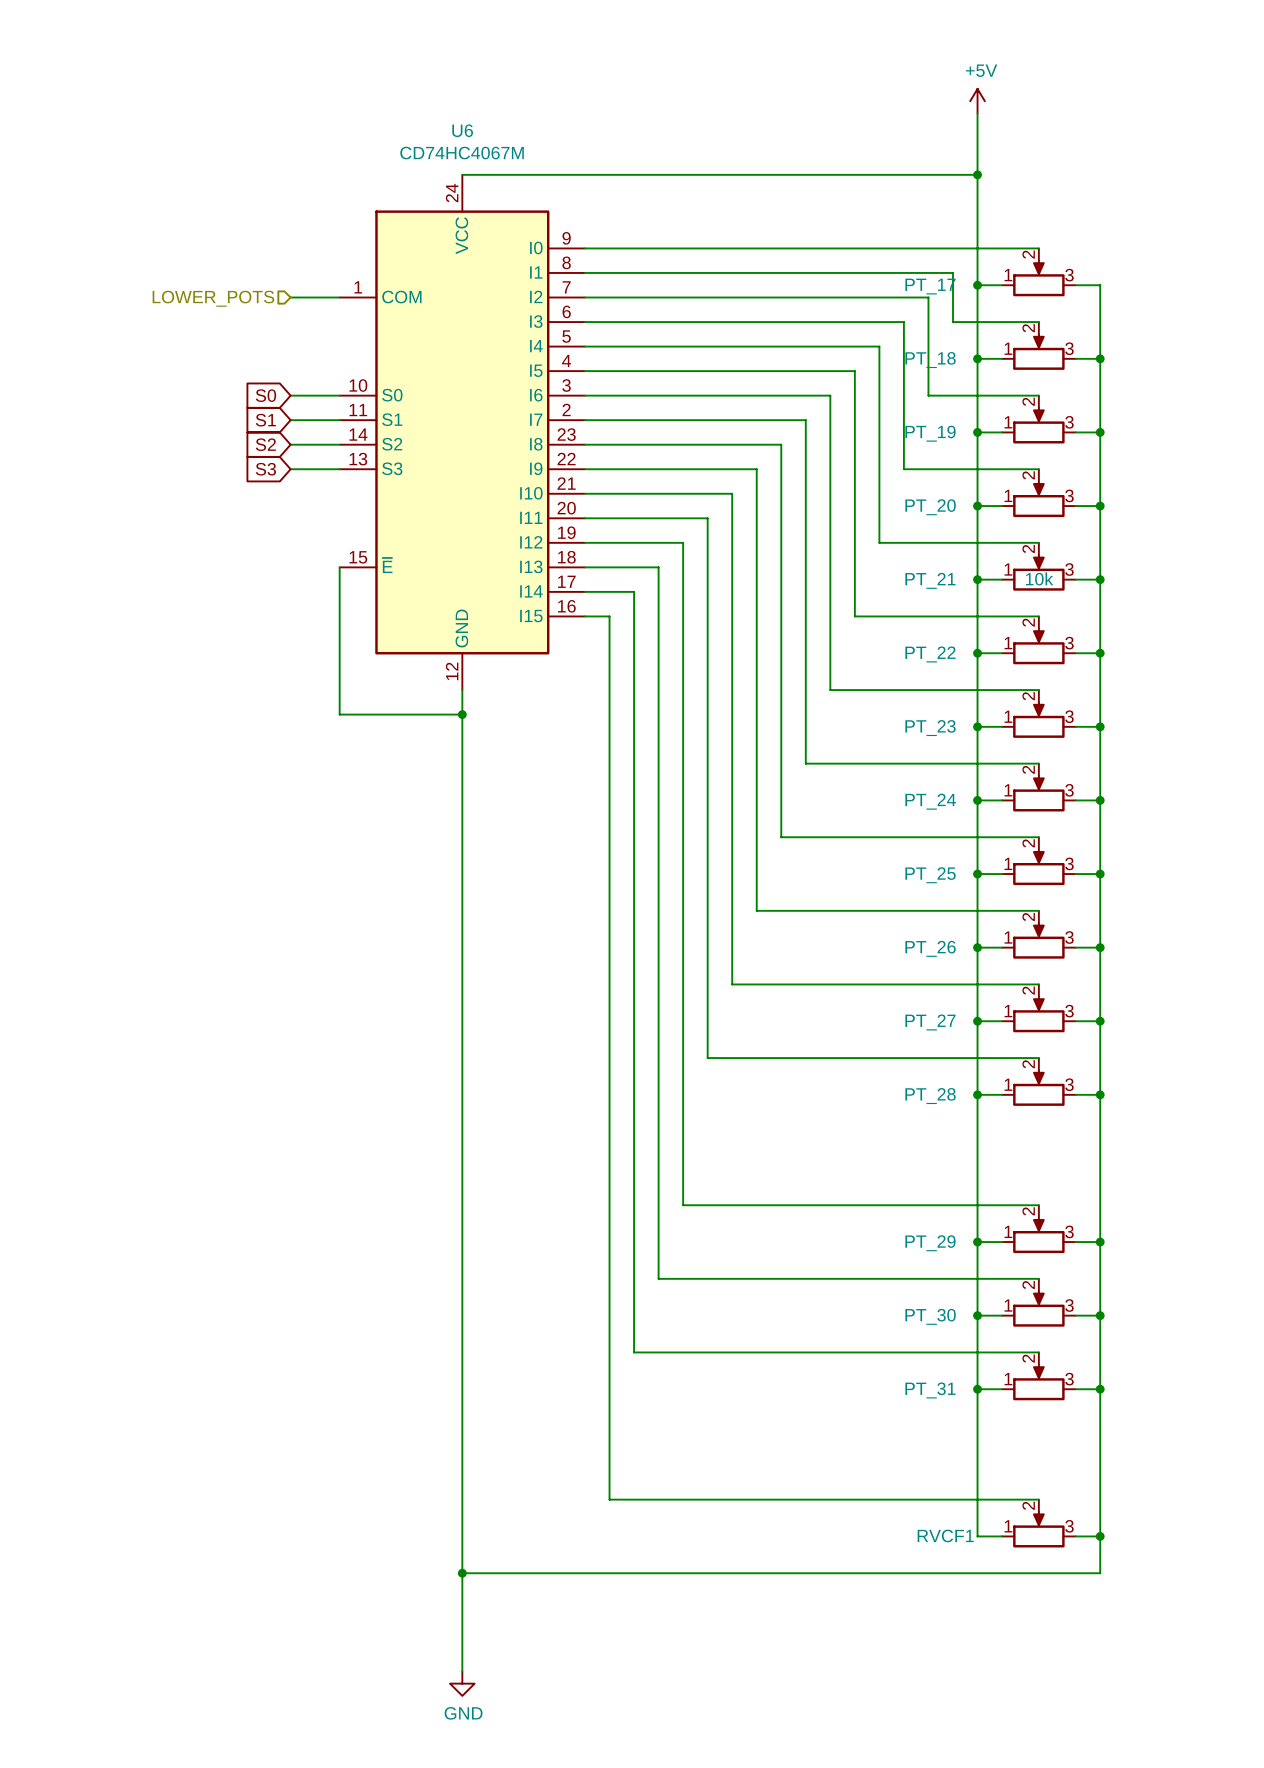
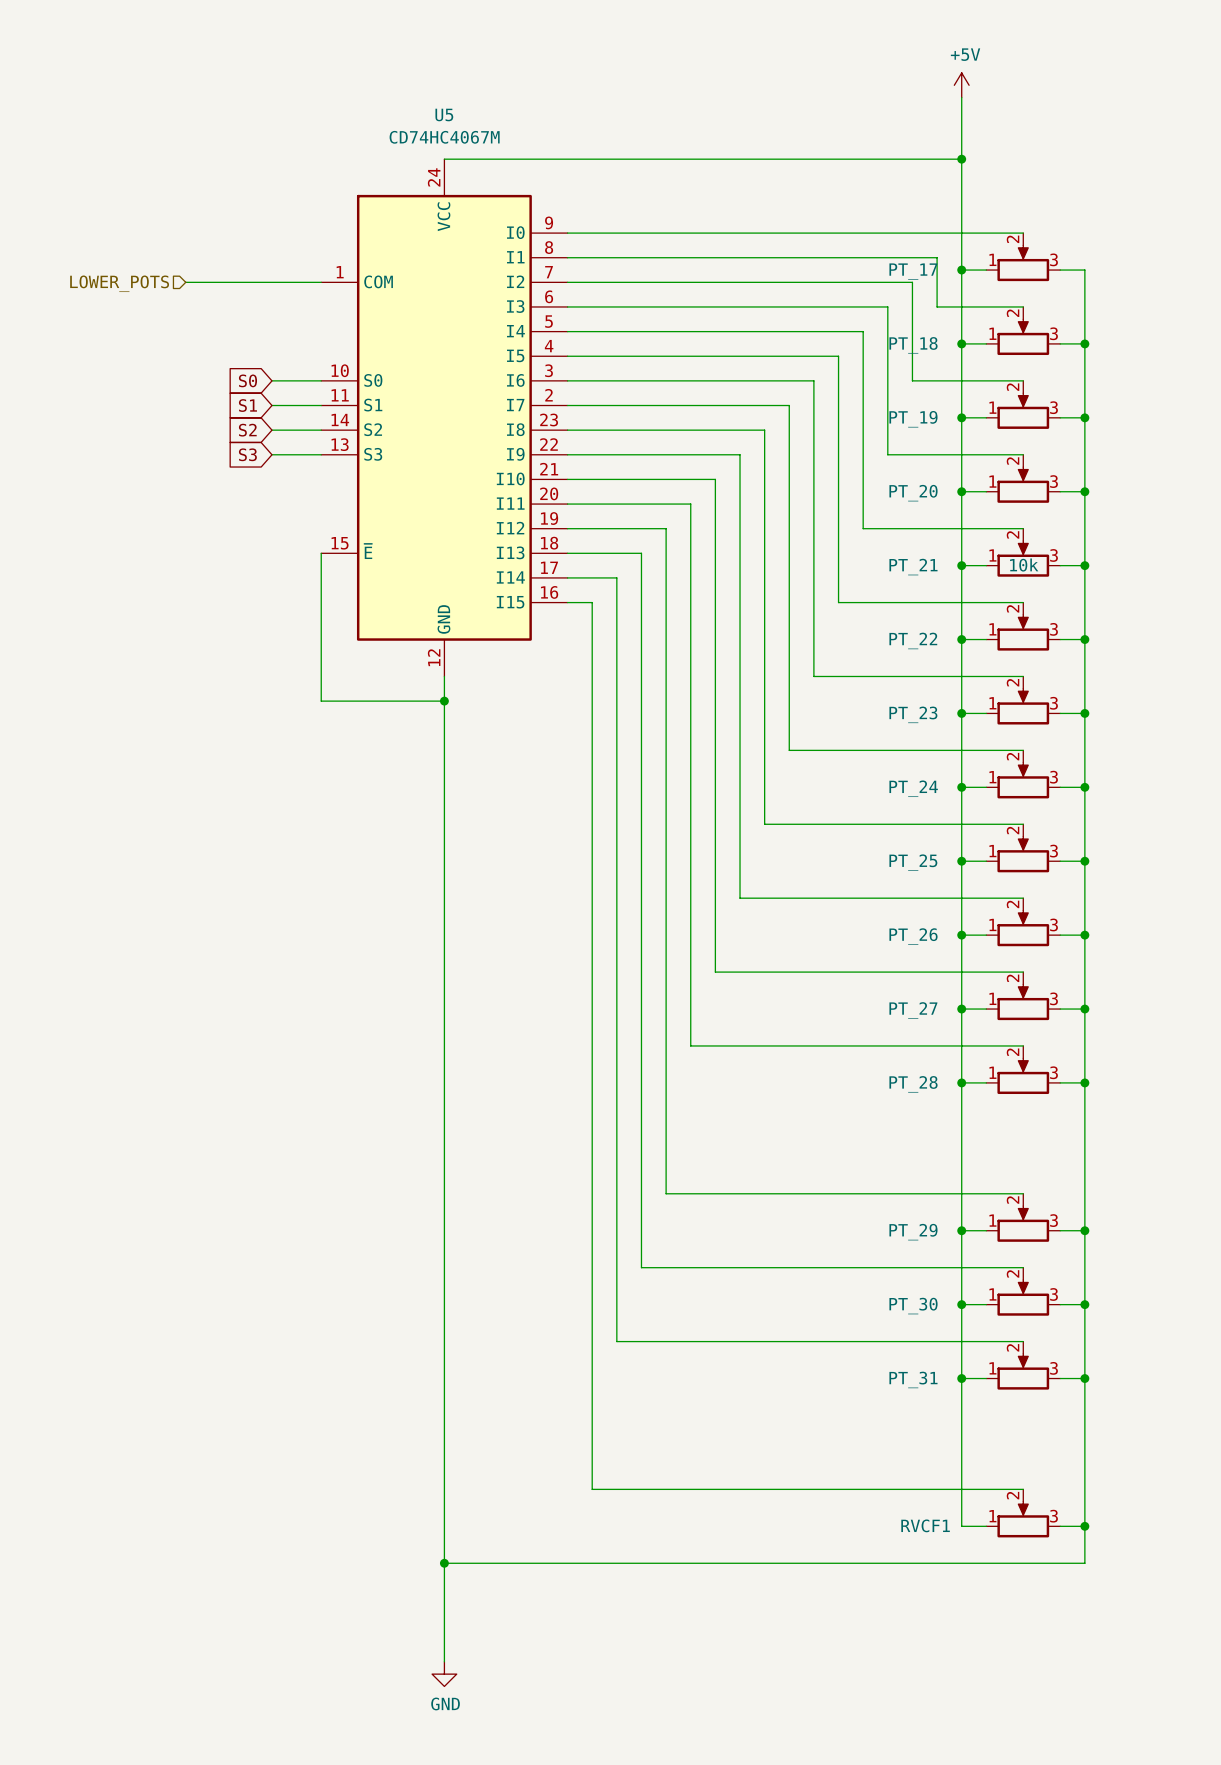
U6 name: U6 (462, 130) -> U5 (444, 114)
wire: none -> (185, 282) (271, 282)
hierarchical label position: LOWER_POTS (213, 298) -> LOWER_POTS (119, 283)

